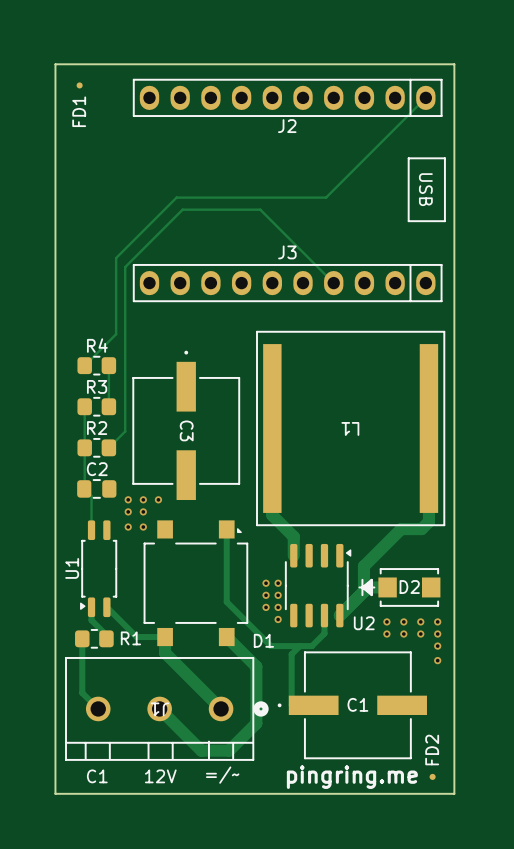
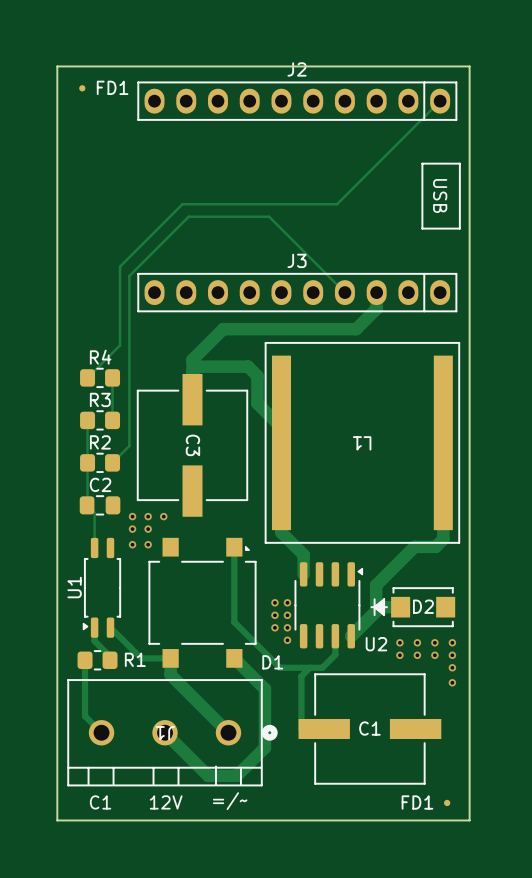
FD1 name rotation: 0° (79, 111) -> 90° clockwise (112, 87)
J2 name position: J2 (287, 126) -> J2 (297, 69)
track: none -> (376, 292) (376, 308) (356, 329) (223, 329) (192, 359) (192, 399)
C3 footprint: [132, 350, 241, 501] -> [136, 373, 249, 517]
track: none -> (192, 372) (198, 366) (248, 366) (257, 376) (257, 403) (281, 427) (281, 442)
C1 footprint: [277, 651, 427, 760] -> [298, 673, 442, 785]
FD2 name: FD2 (432, 750) -> FD1 (417, 802)
text: pingring.me (352, 777) -> none

